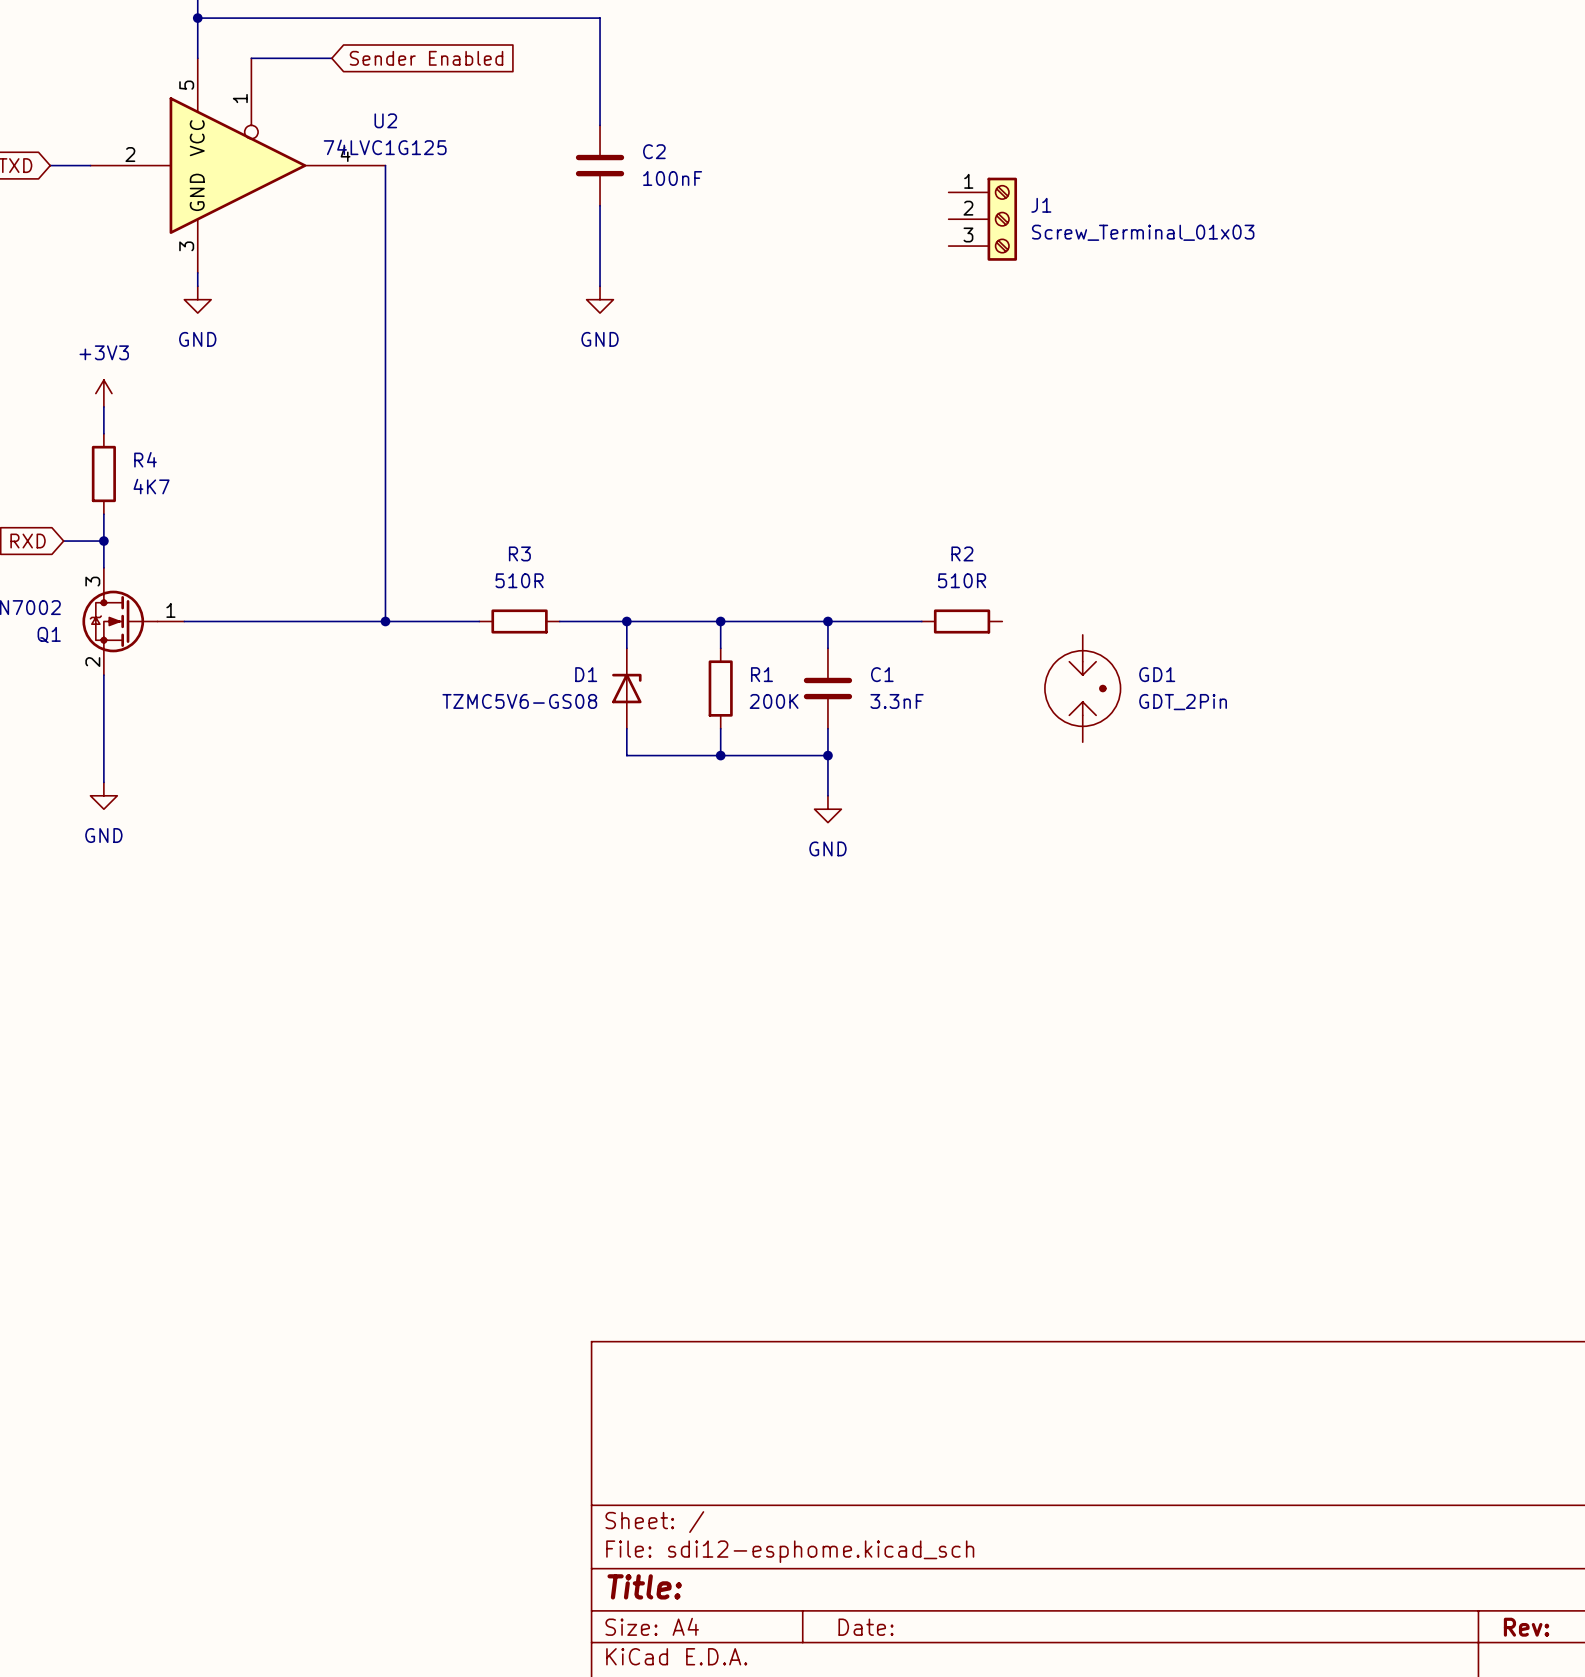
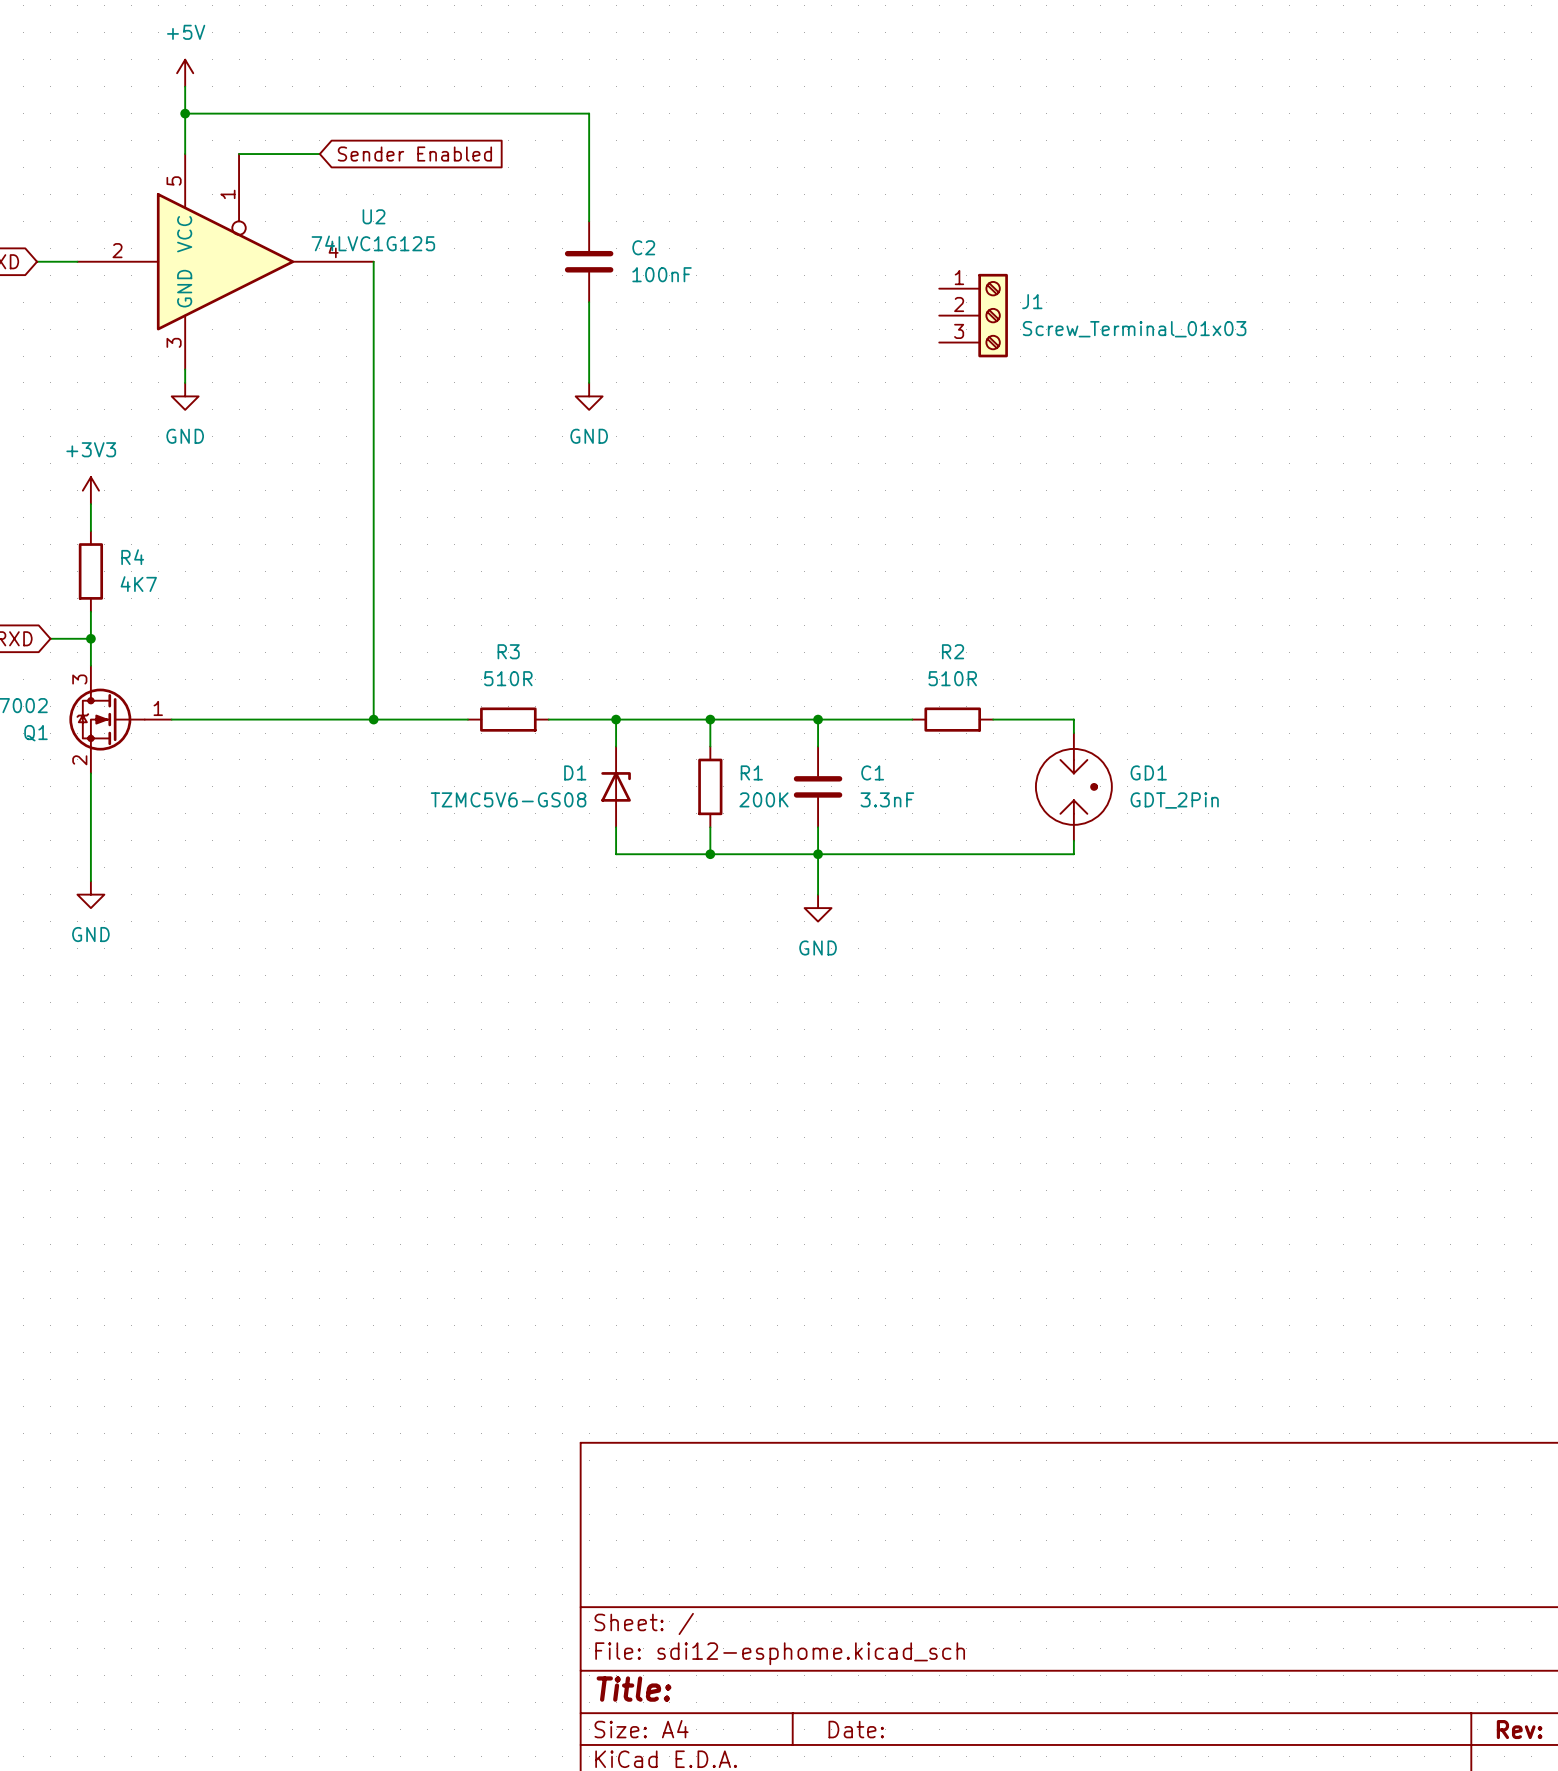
wire: none -> (993, 719) (1073, 719) (1073, 733)
wire: none -> (1073, 840) (1073, 854) (818, 854)

